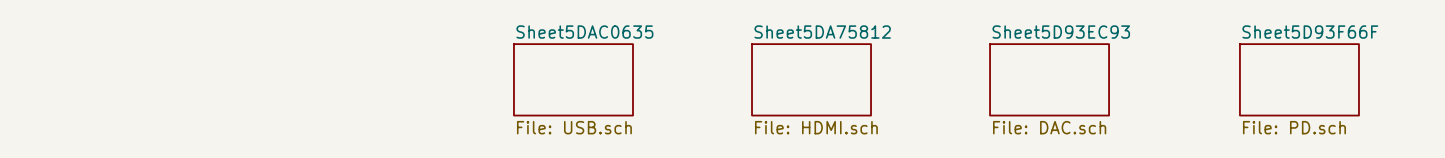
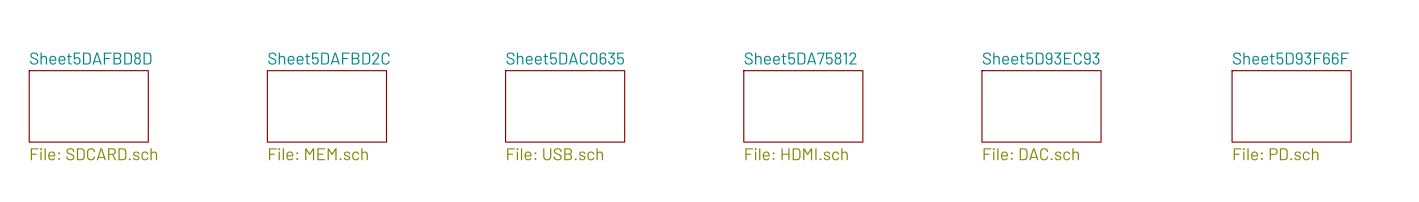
sheet Sheet5DAFBD8D: none -> File: SDCARD.sch (88, 106)
sheet Sheet5DAFBD2C: none -> File: MEM.sch (326, 106)

